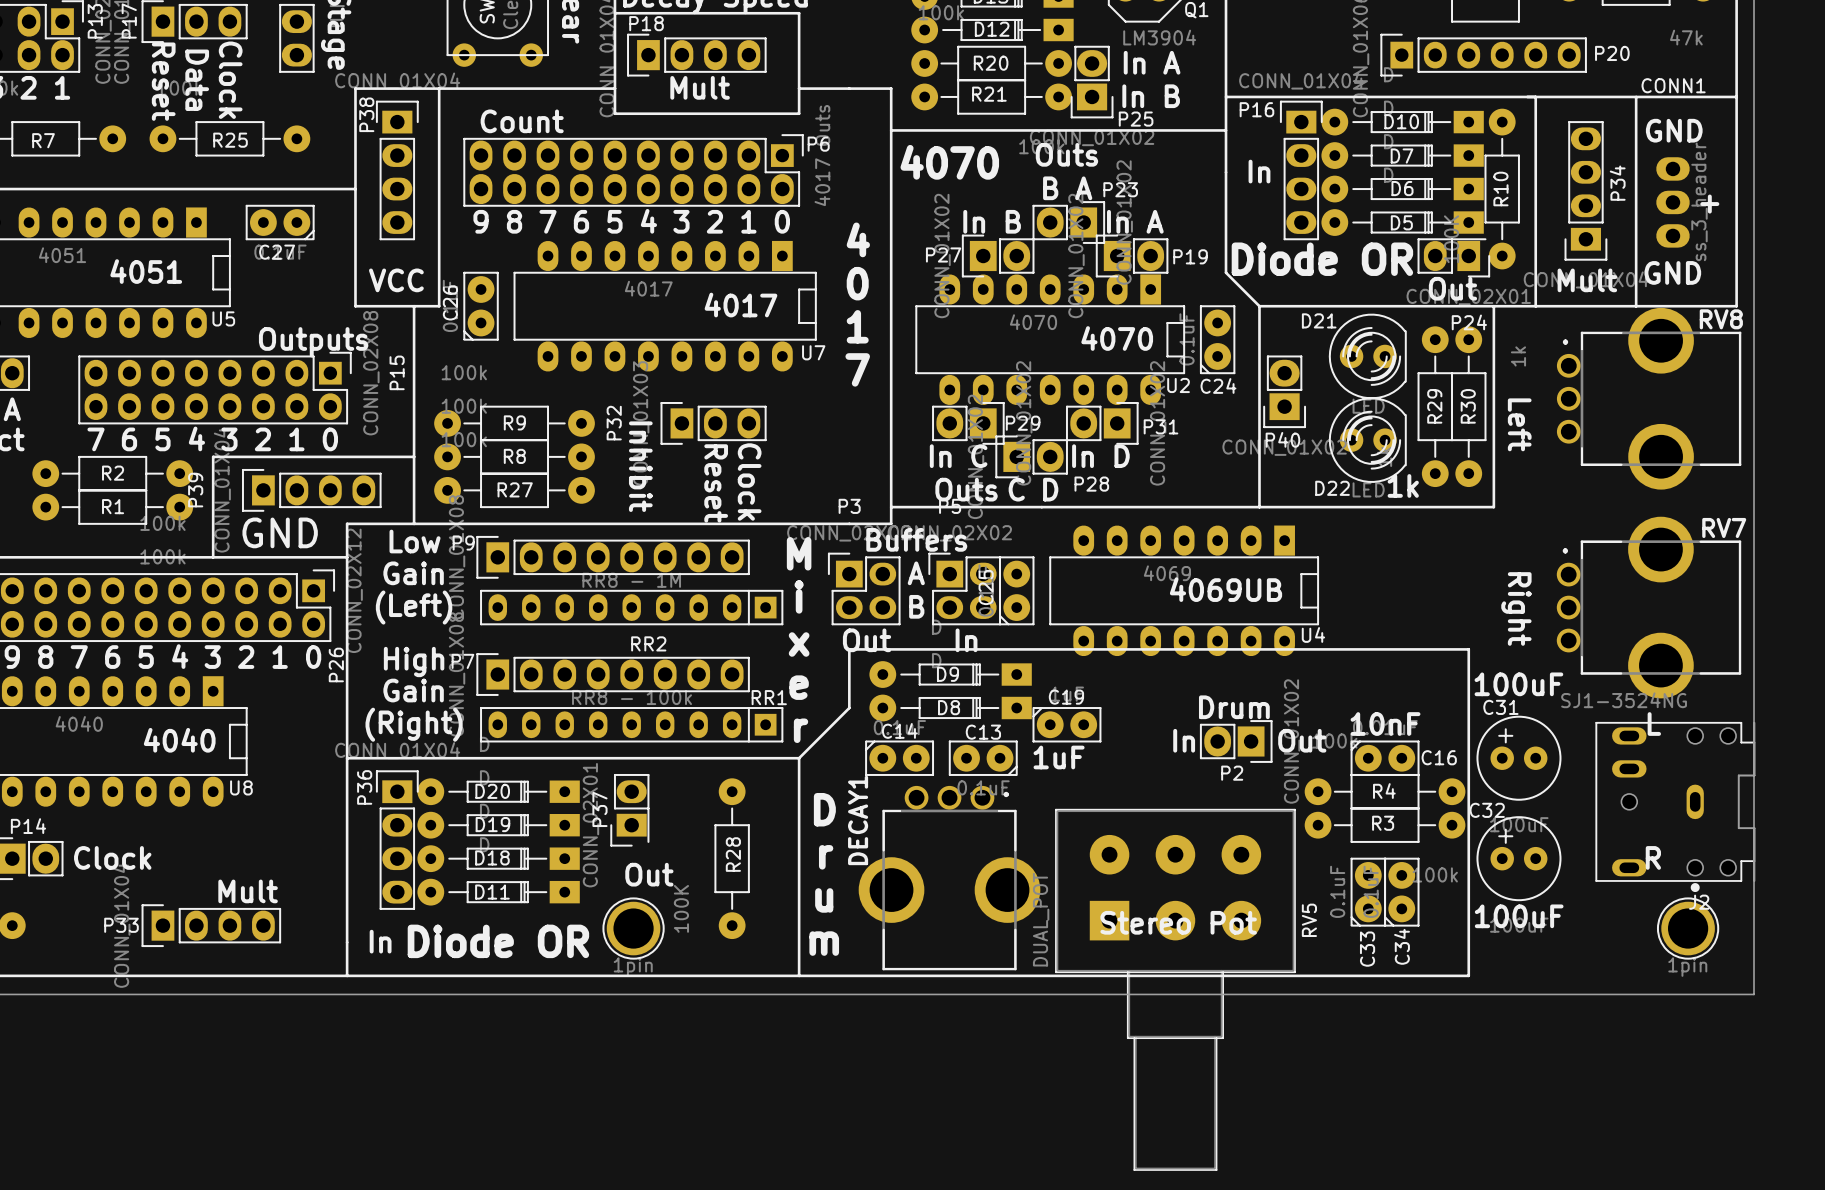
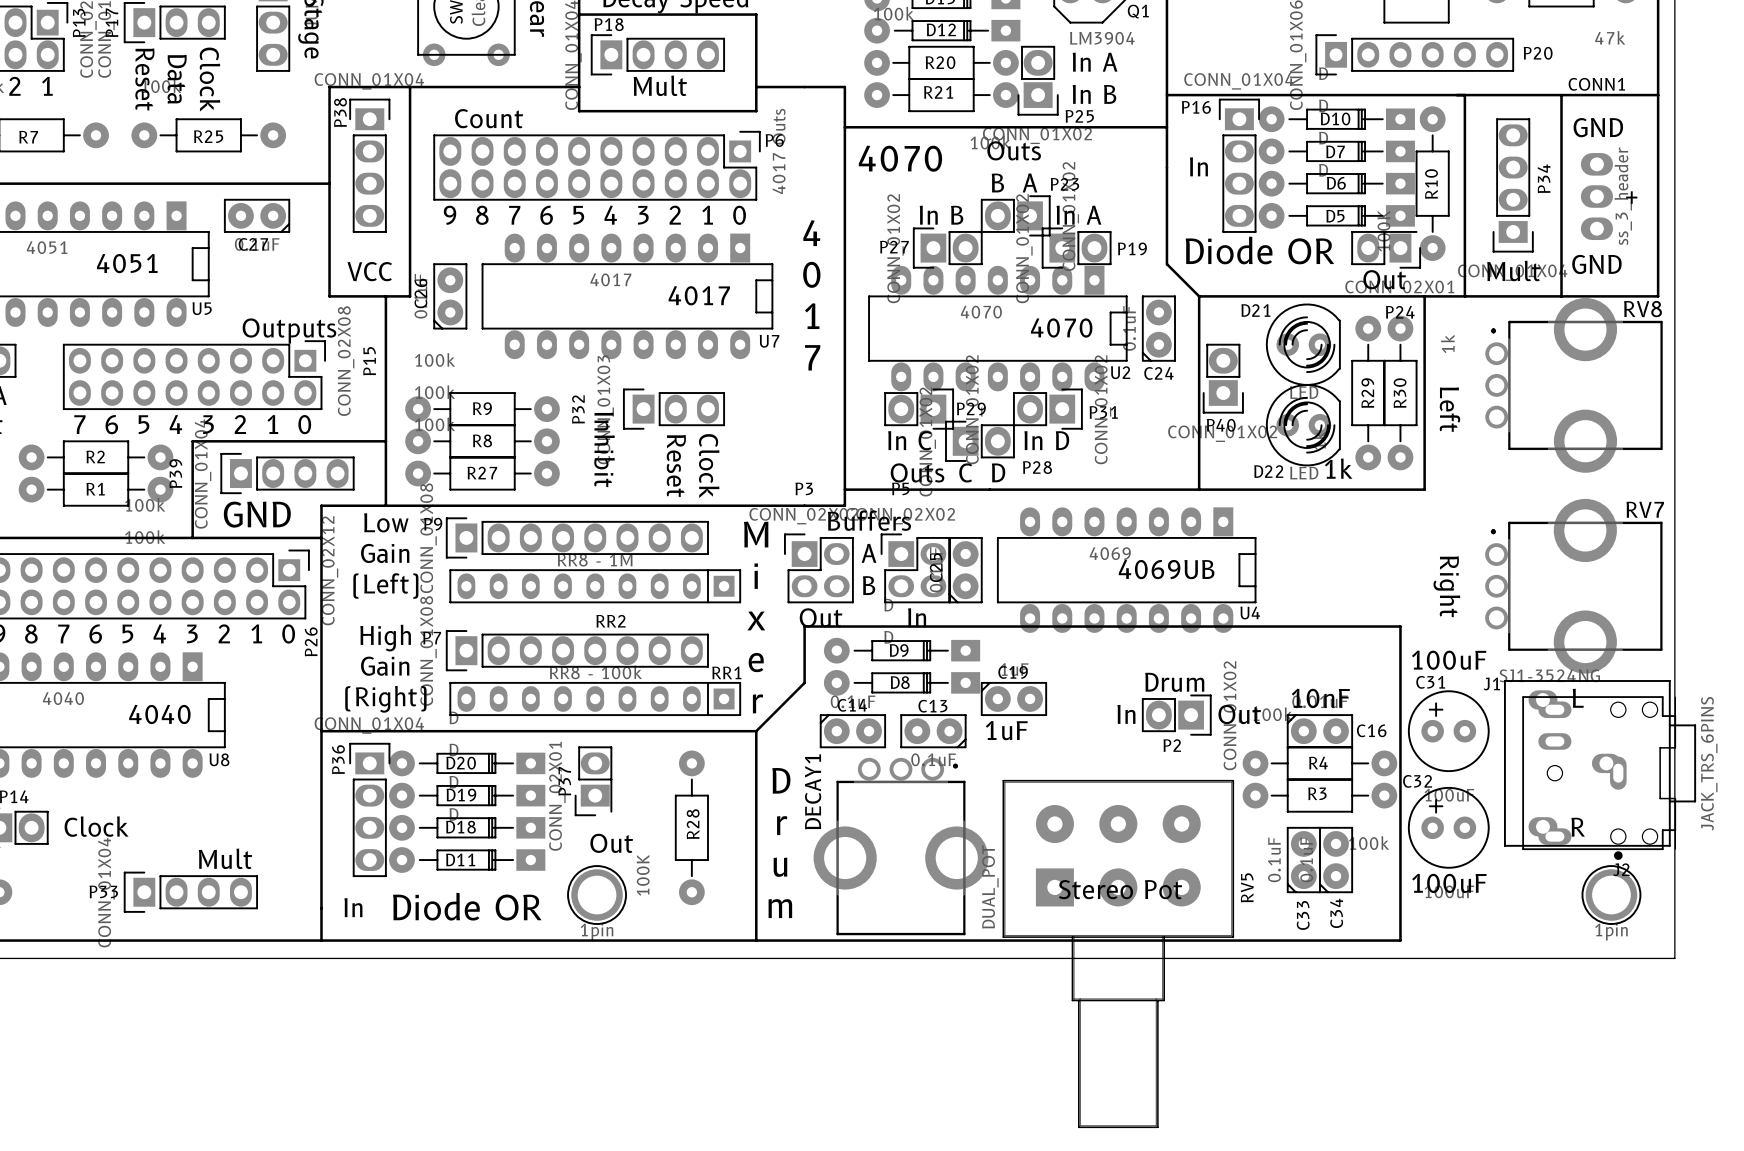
J1: none -> JACK_TRS_6PINS (1600, 763)

